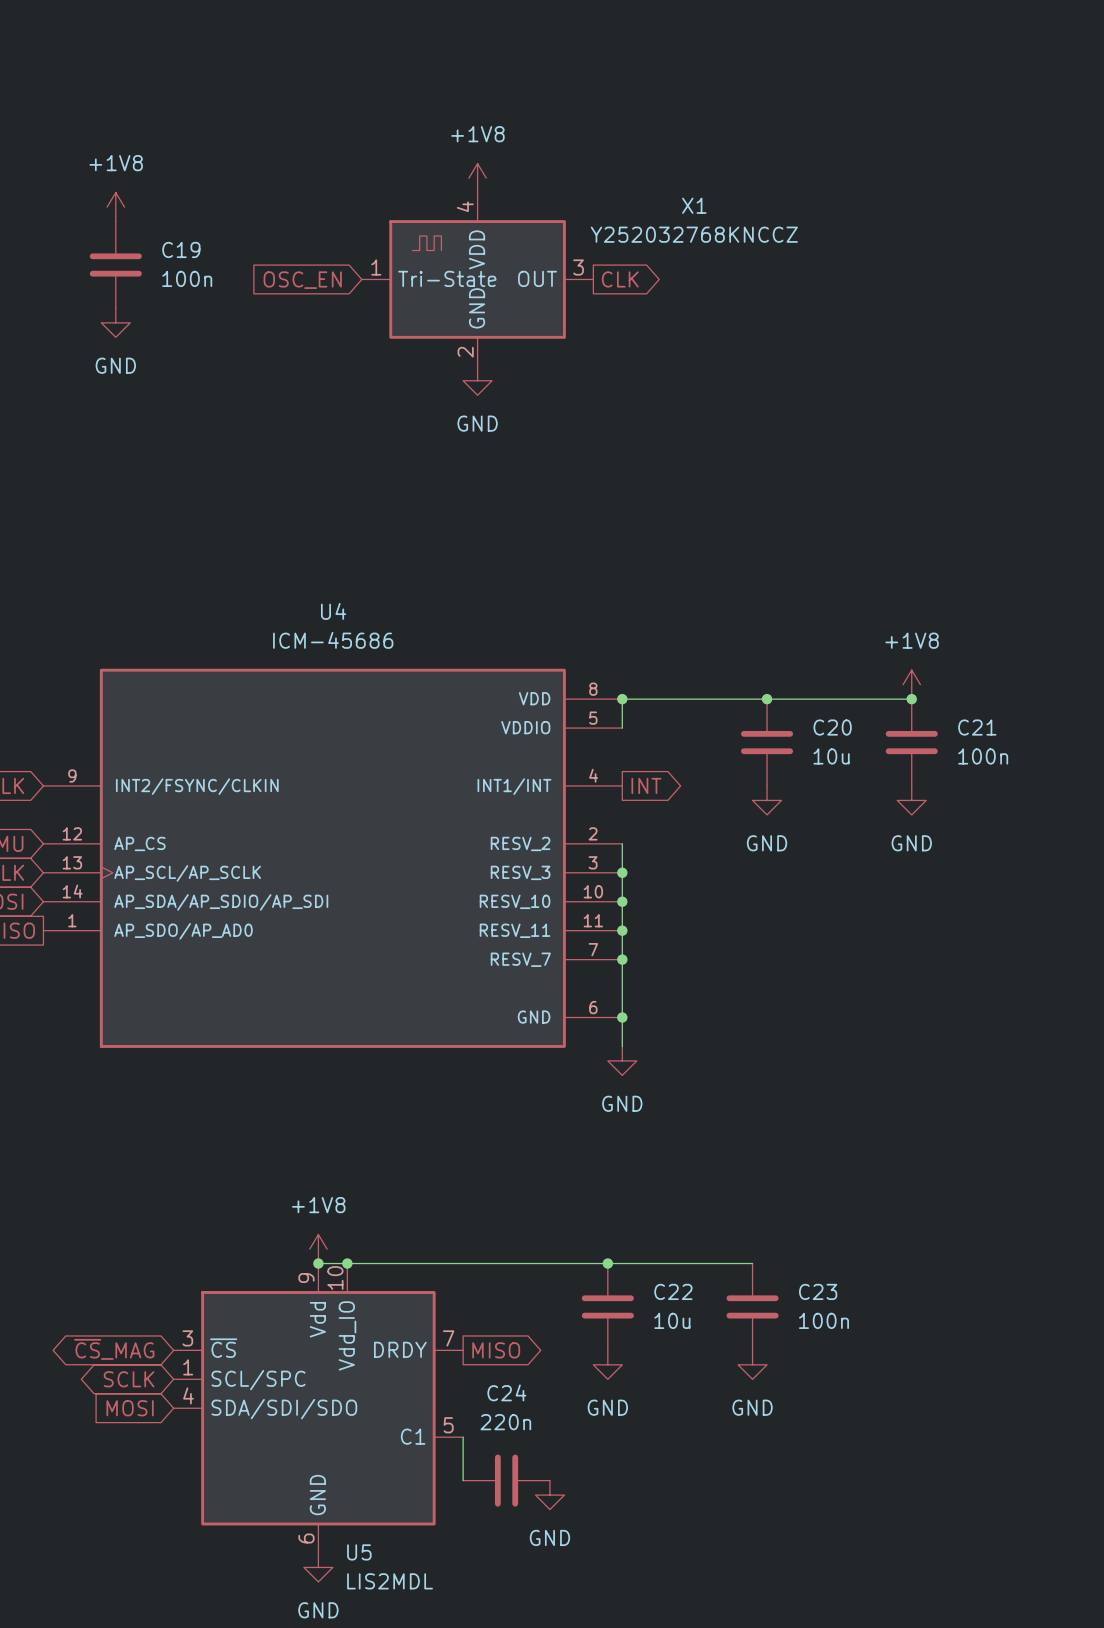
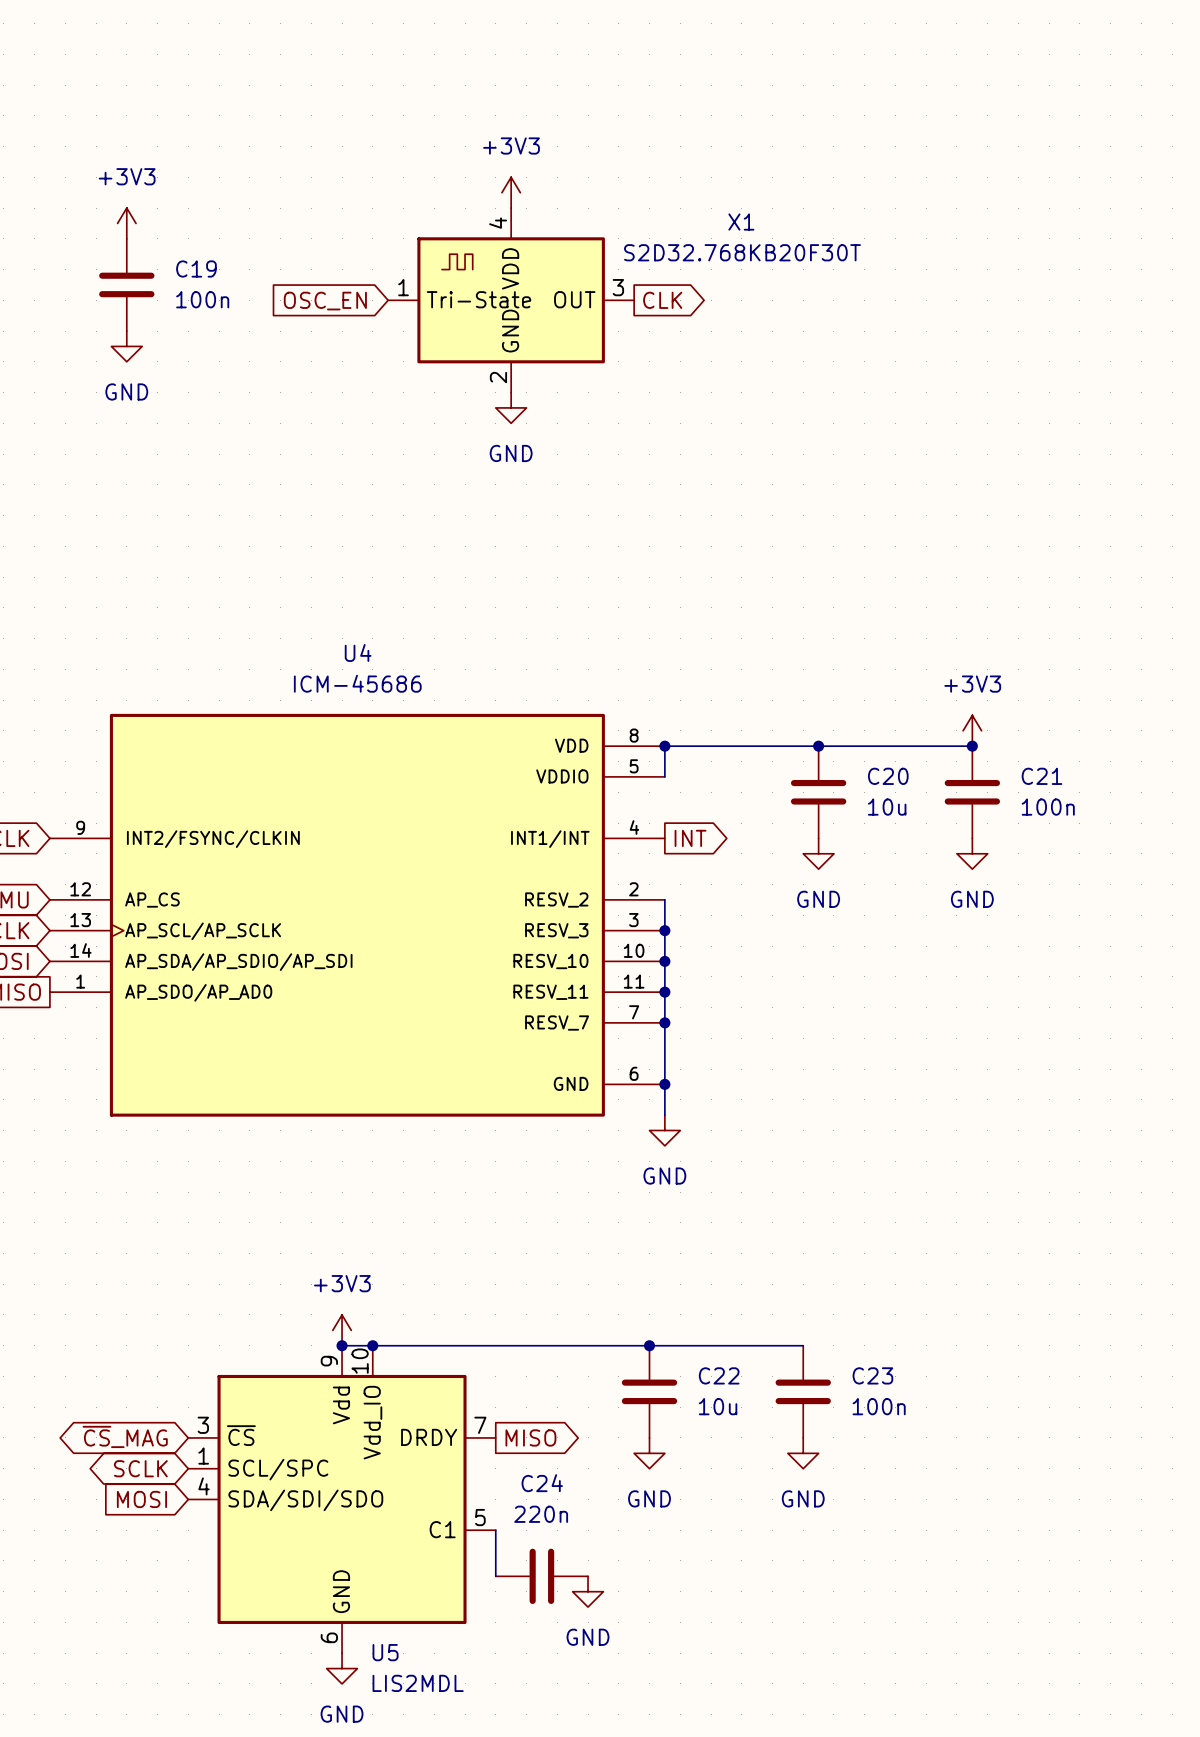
power symbol: +1V8 (477, 178) -> +3V3 (511, 192)
power symbol: +1V8 (115, 207) -> +3V3 (126, 223)
X1 value: Y252032768KNCCZ (694, 234) -> S2D32.768KB20F30T (742, 252)
power symbol: +1V8 (911, 684) -> +3V3 (972, 730)
power symbol: +1V8 (318, 1249) -> +3V3 (342, 1330)

